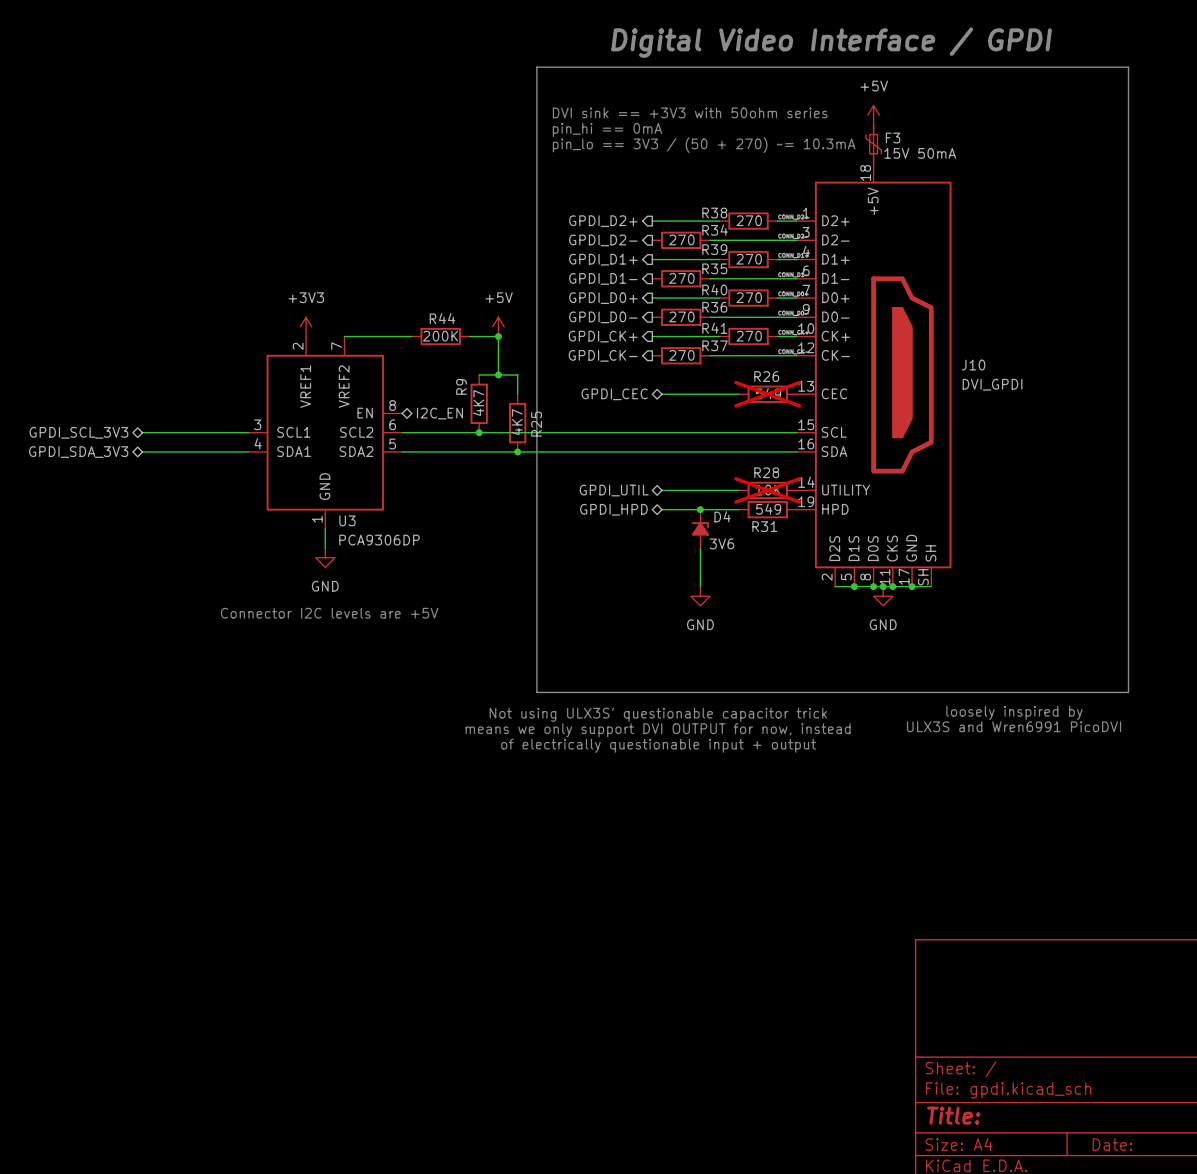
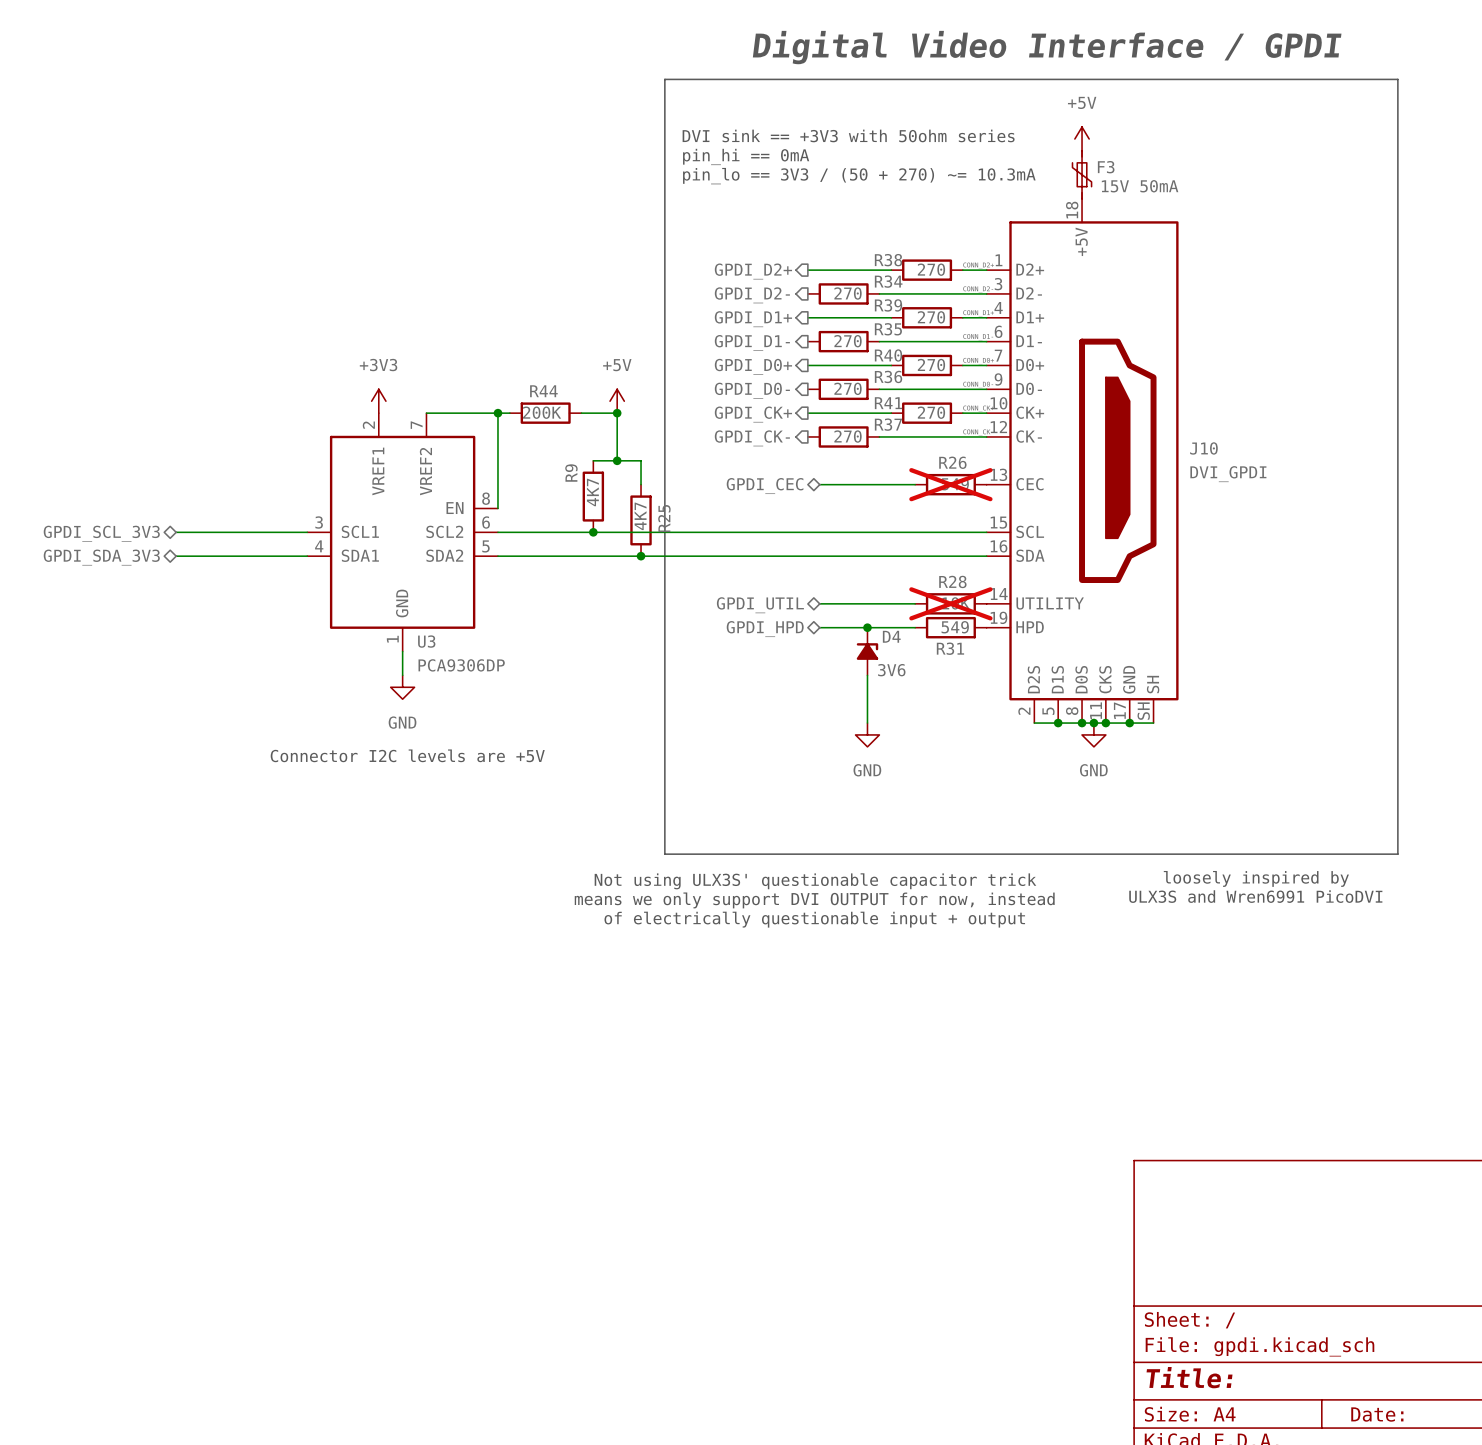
wire: none -> (497, 413) (497, 508)
junction: none -> (497, 413)
hierarchical label: I2C_EN (439, 413) -> none

